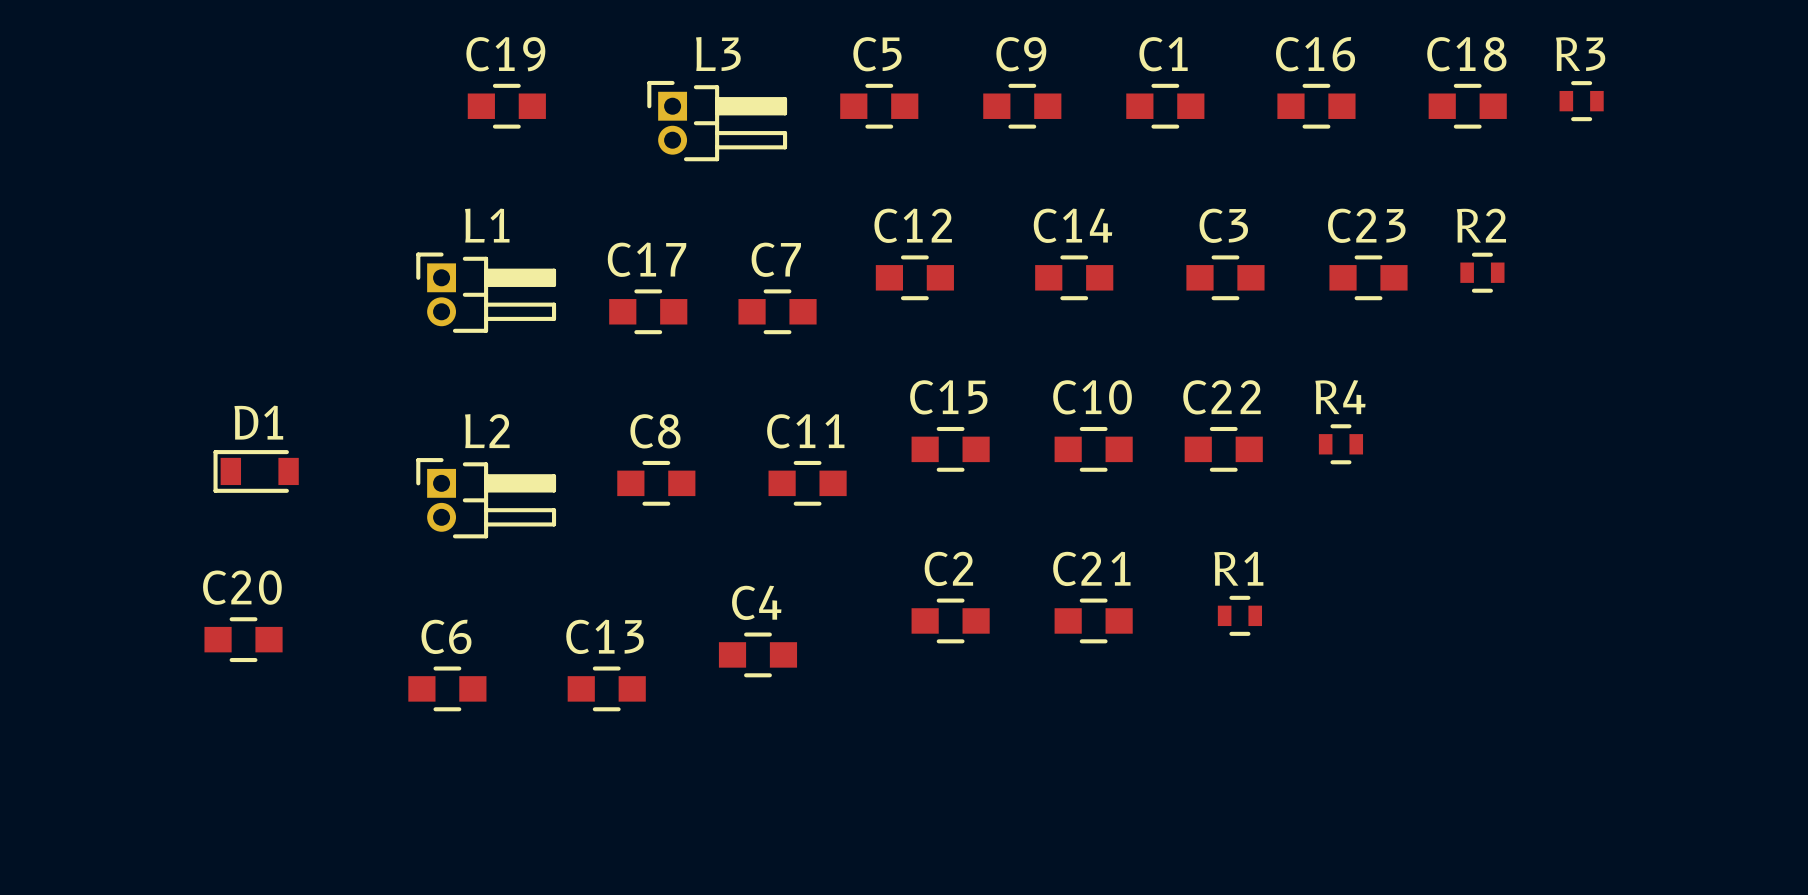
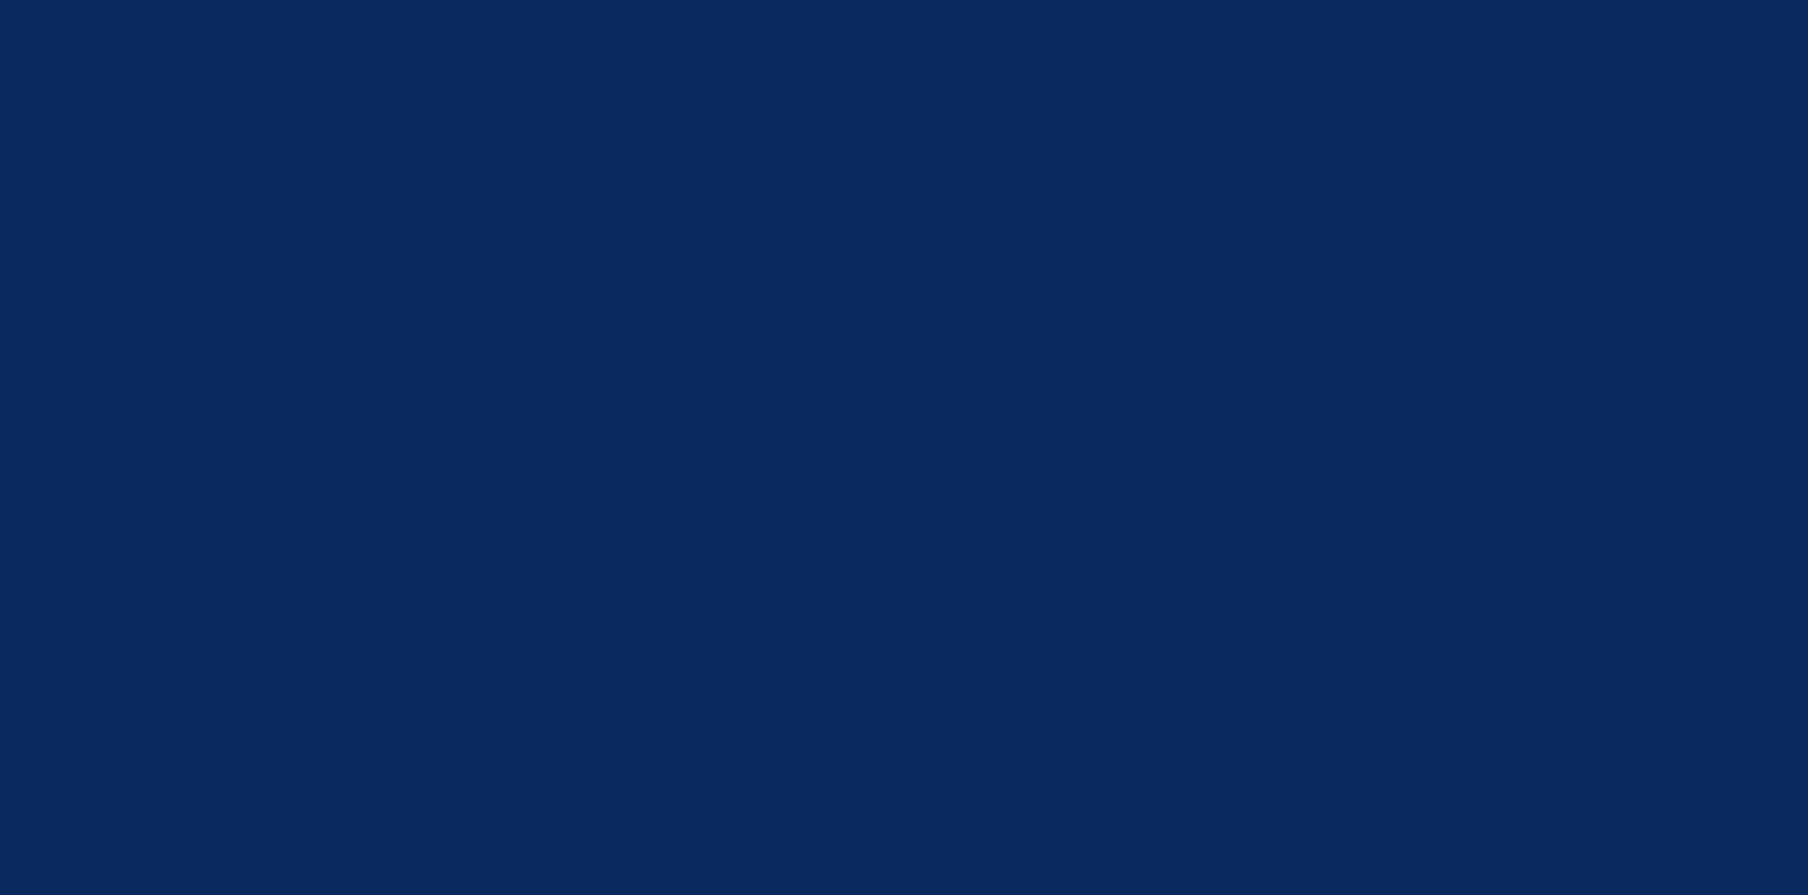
R3: (1581, 101) -> none
C19: (506, 106) -> none
C5: (879, 106) -> none
C9: (1022, 106) -> none
C1: (1165, 106) -> none
C16: (1316, 106) -> none
C18: (1467, 106) -> none
L3: (717, 121) -> none
R2: (1482, 272) -> none
C12: (914, 277) -> none
C14: (1074, 277) -> none
C3: (1225, 277) -> none
C23: (1368, 277) -> none
L1: (486, 292) -> none
C17: (648, 311) -> none
C7: (777, 311) -> none
R4: (1340, 444) -> none
C15: (950, 449) -> none
C10: (1093, 449) -> none
C22: (1223, 449) -> none
D1: (256, 471) -> none
C8: (656, 483) -> none
C11: (807, 483) -> none
L2: (486, 498) -> none
R1: (1239, 615) -> none
C2: (950, 620) -> none
C21: (1093, 620) -> none
C20: (243, 639) -> none
C4: (757, 654) -> none
C6: (447, 688) -> none
C13: (606, 688) -> none

